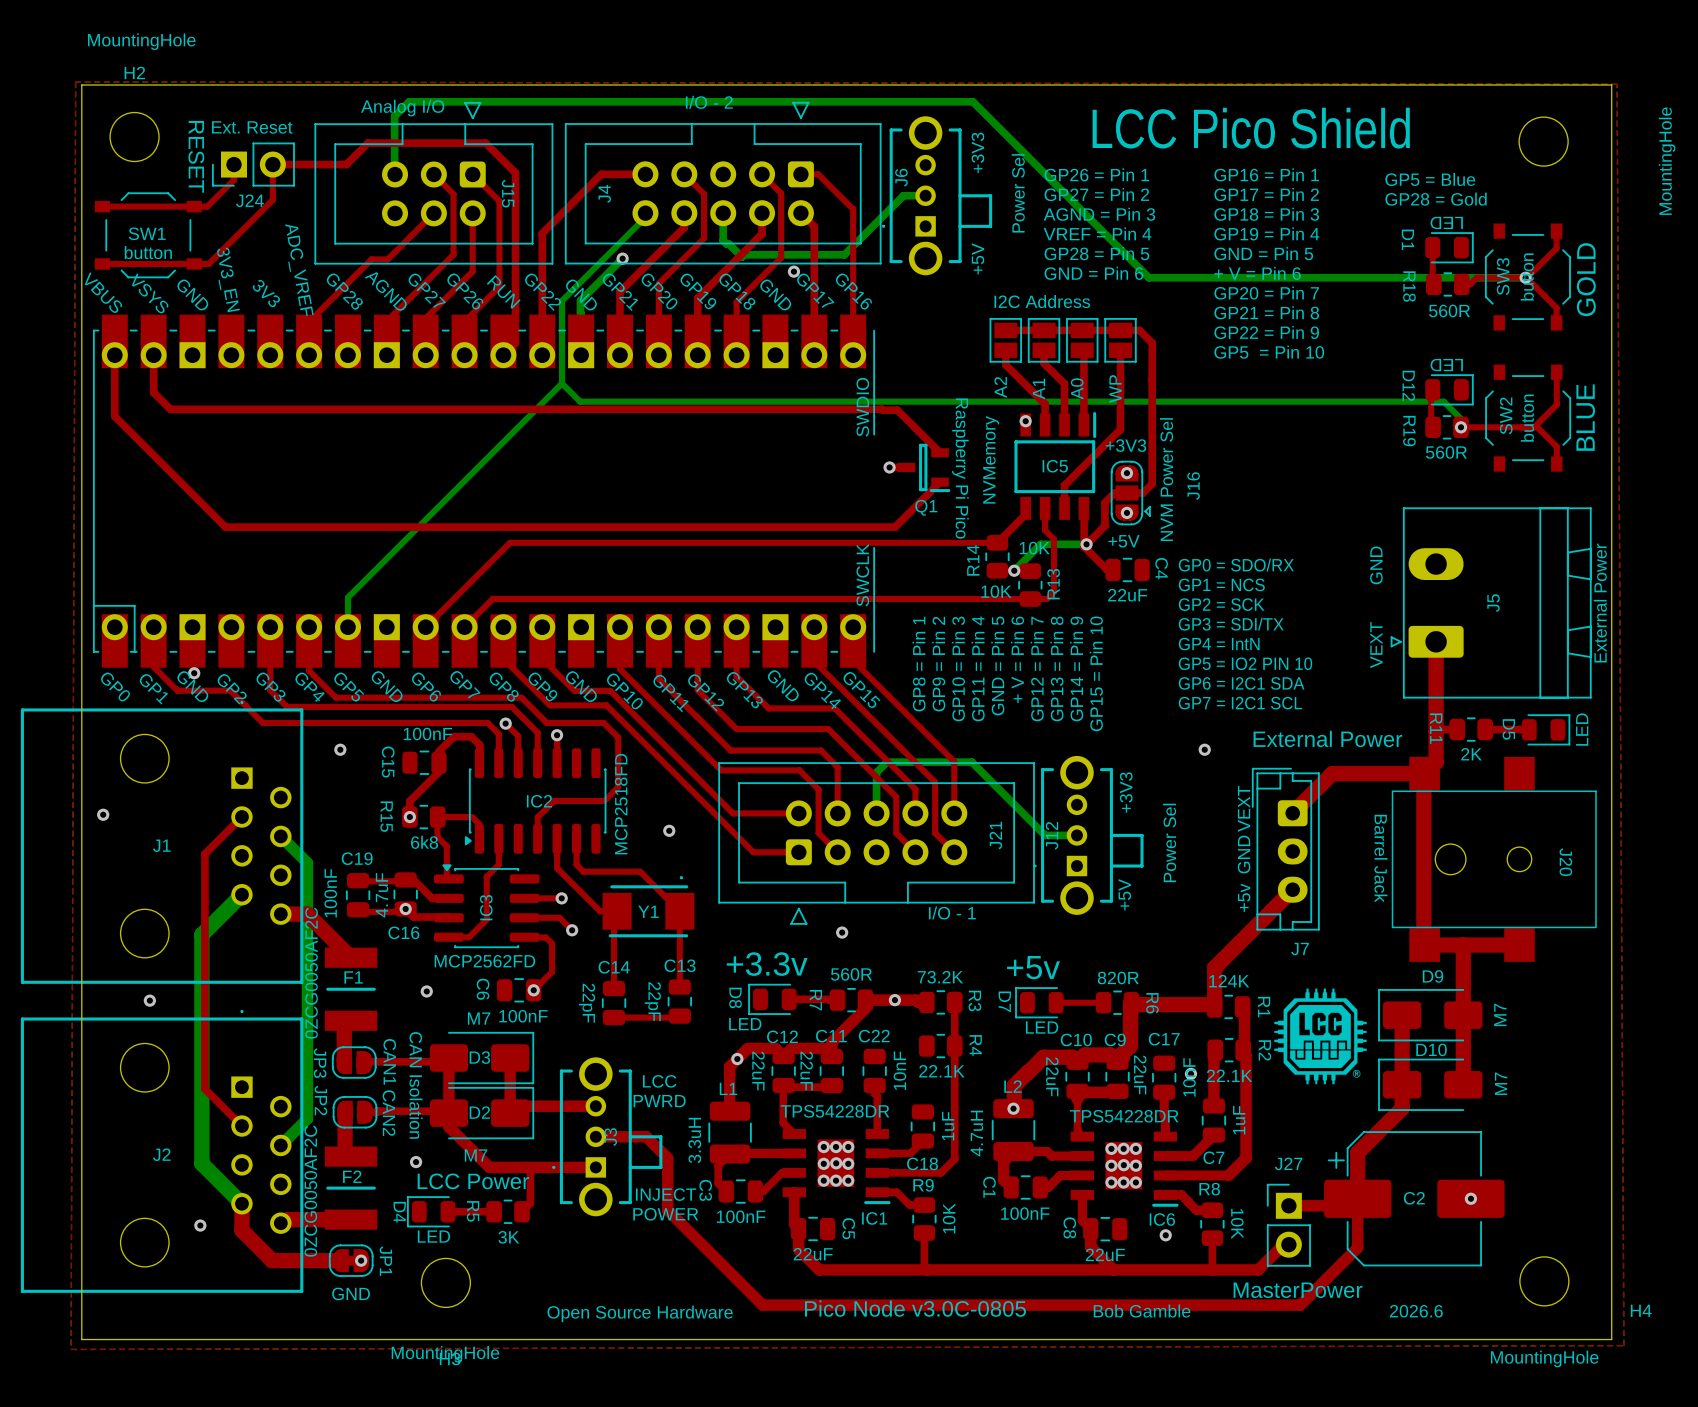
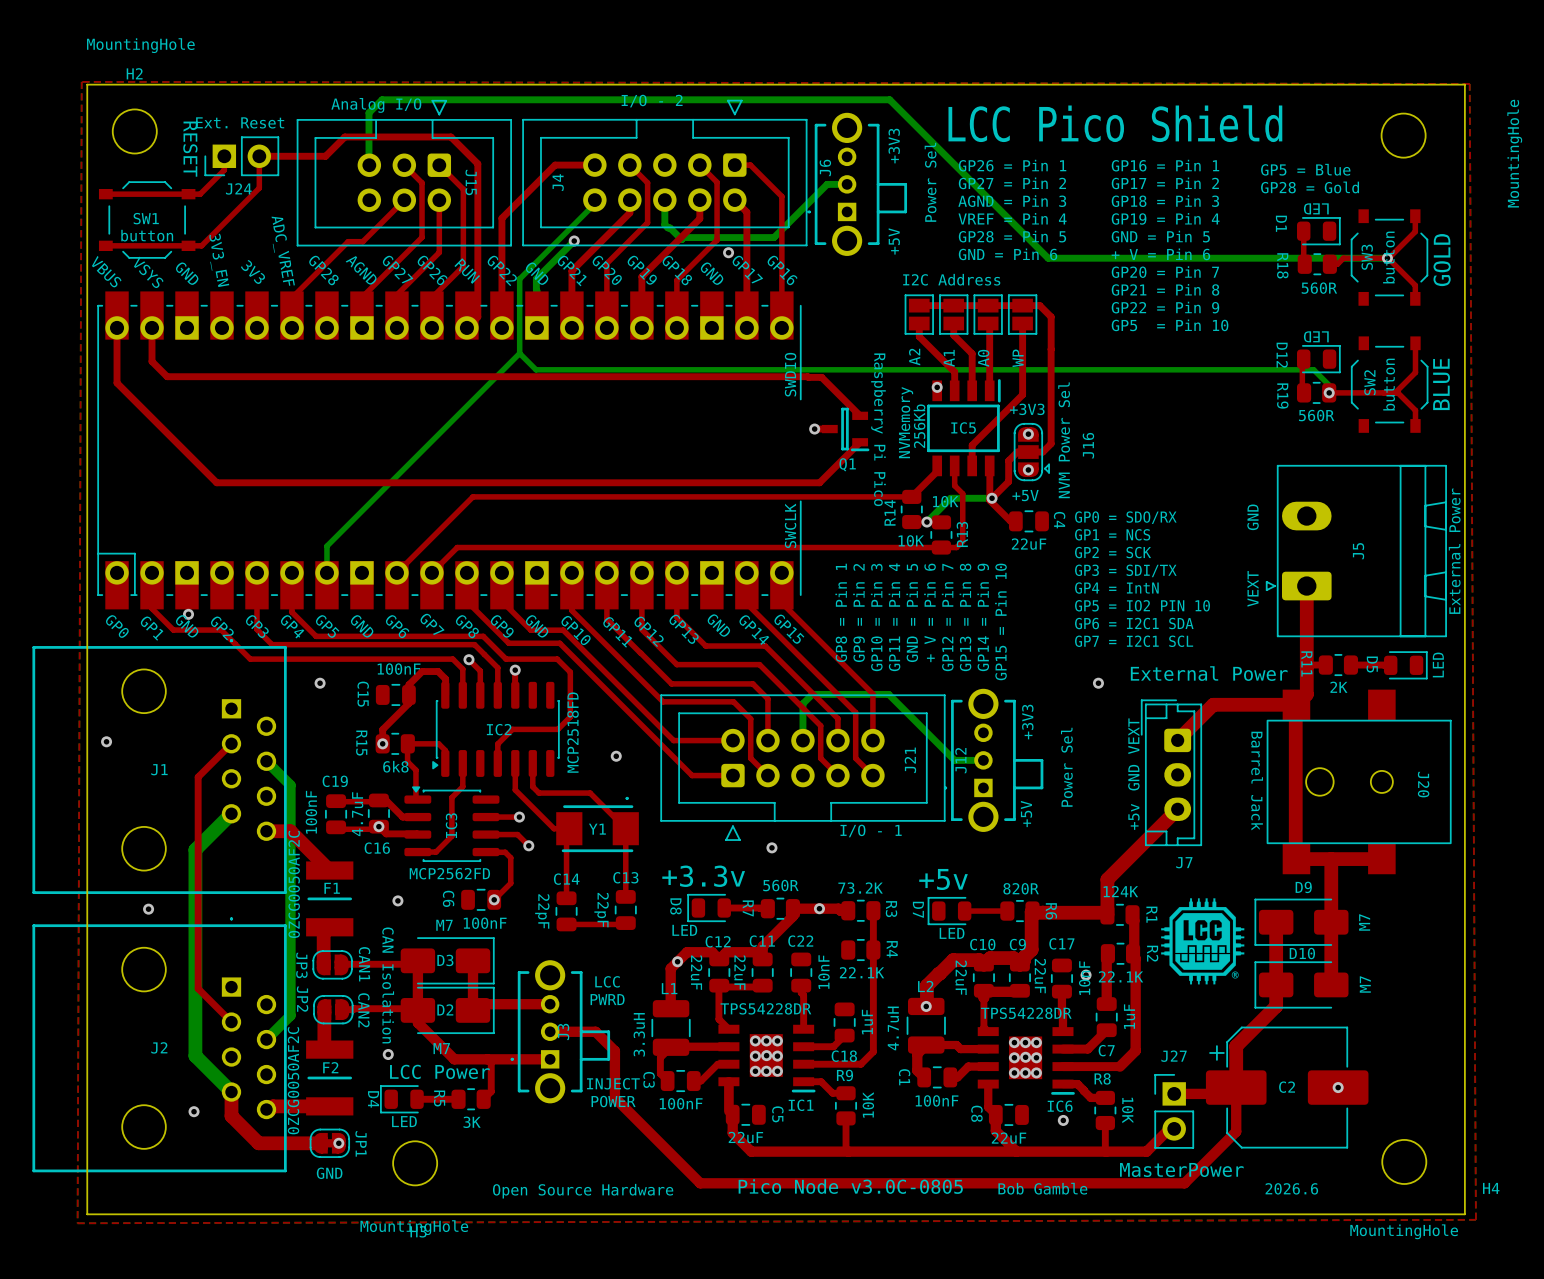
IC5 value: none -> 256Kb (919, 426)

